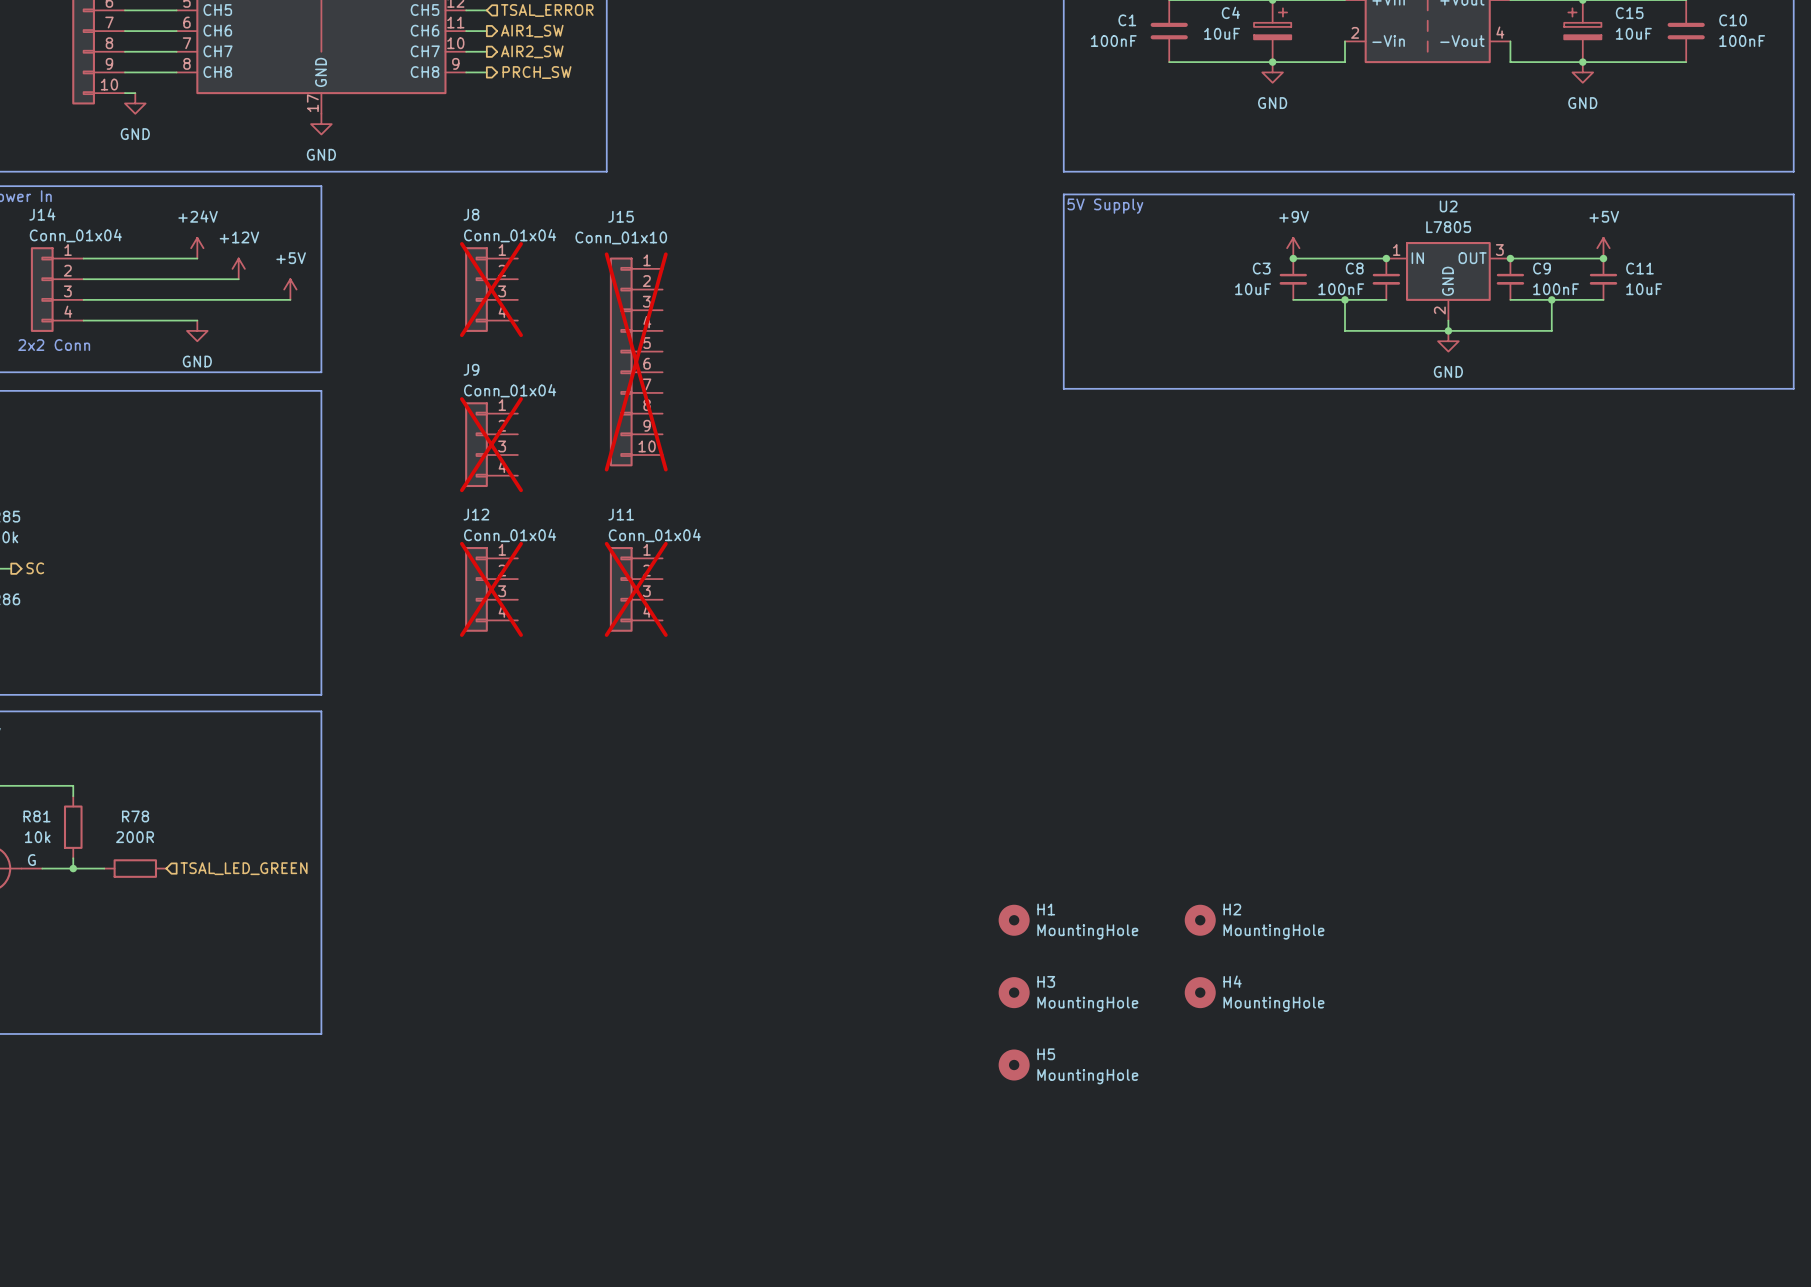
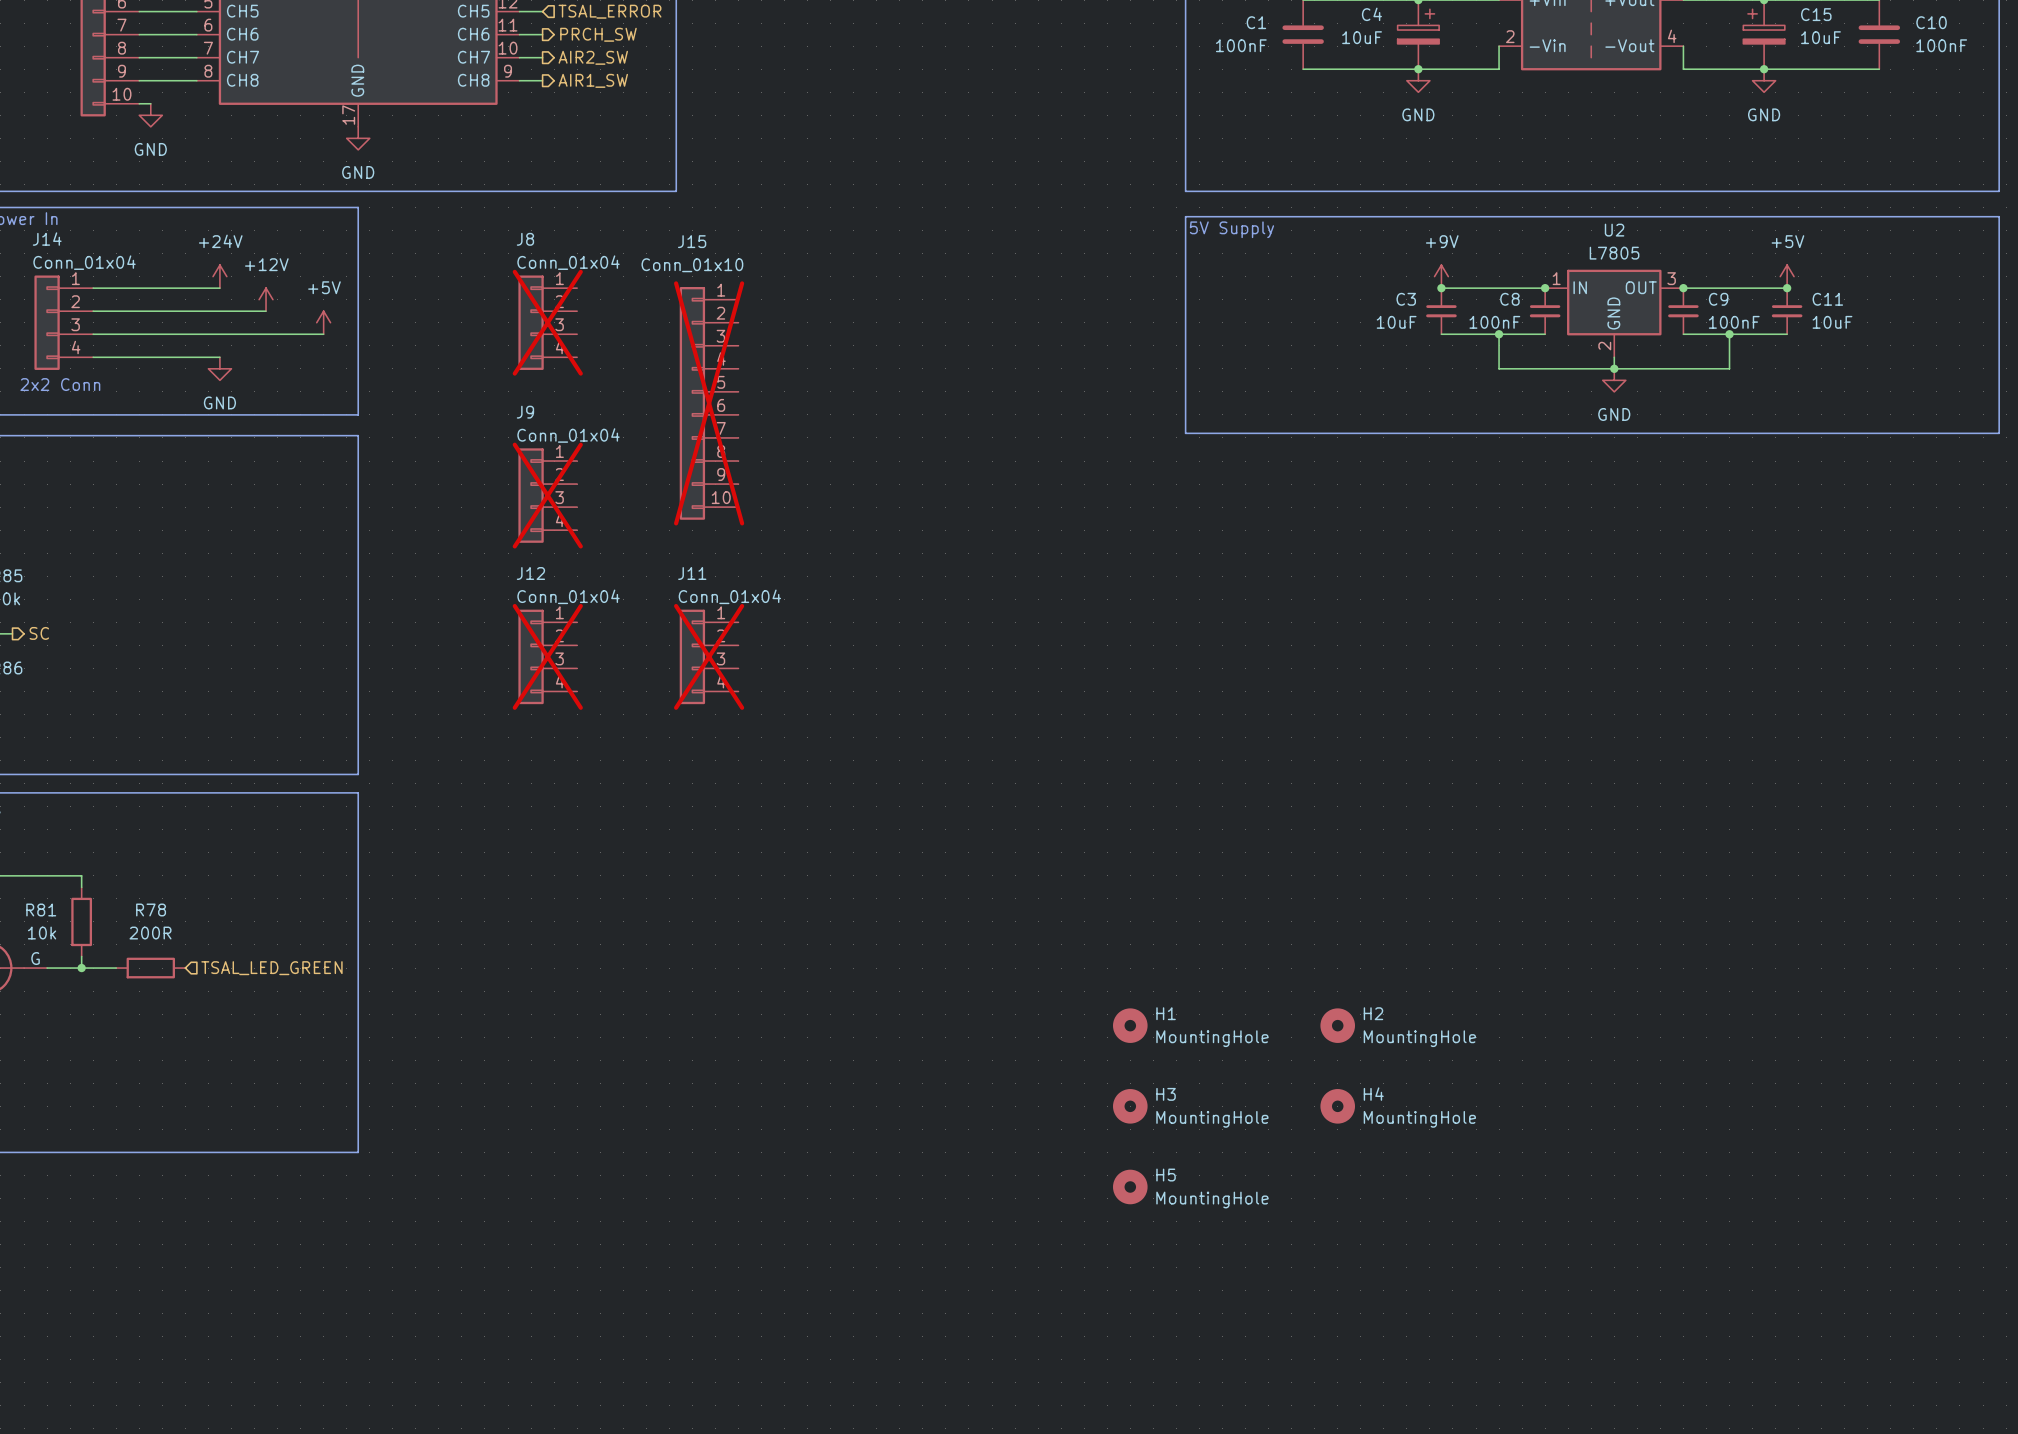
hierarchical label: AIR1_SW (532, 31) -> PRCH_SW (598, 34)
hierarchical label: PRCH_SW (536, 72) -> AIR1_SW (593, 80)

